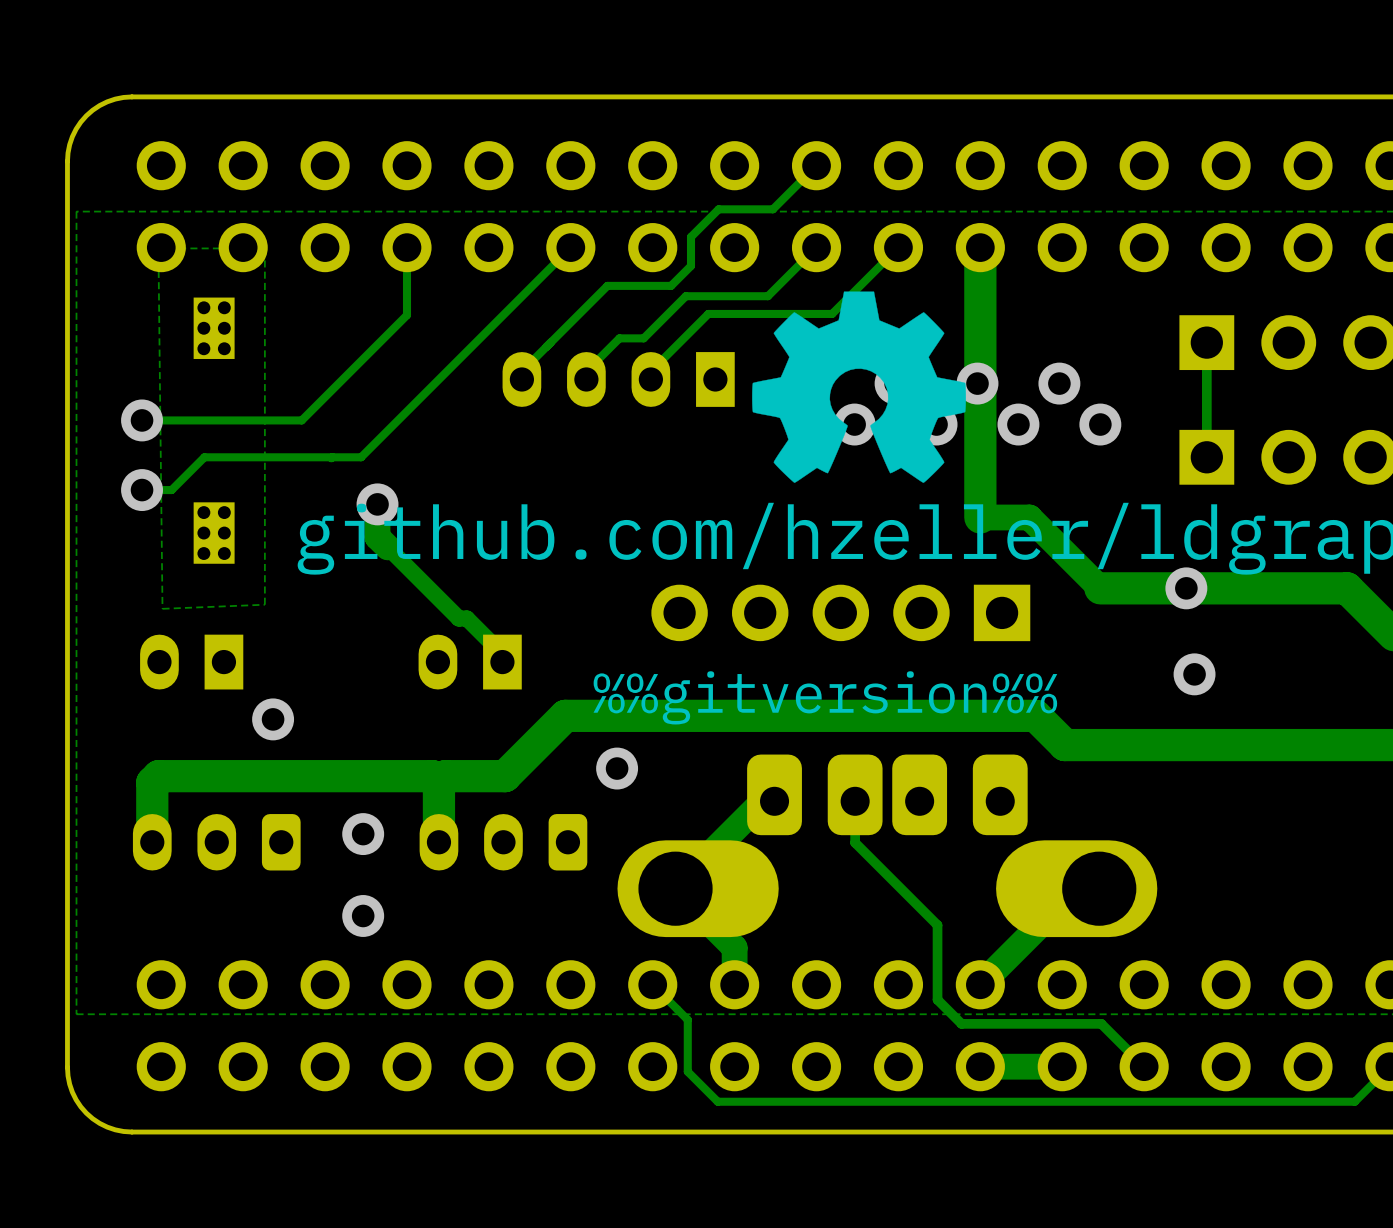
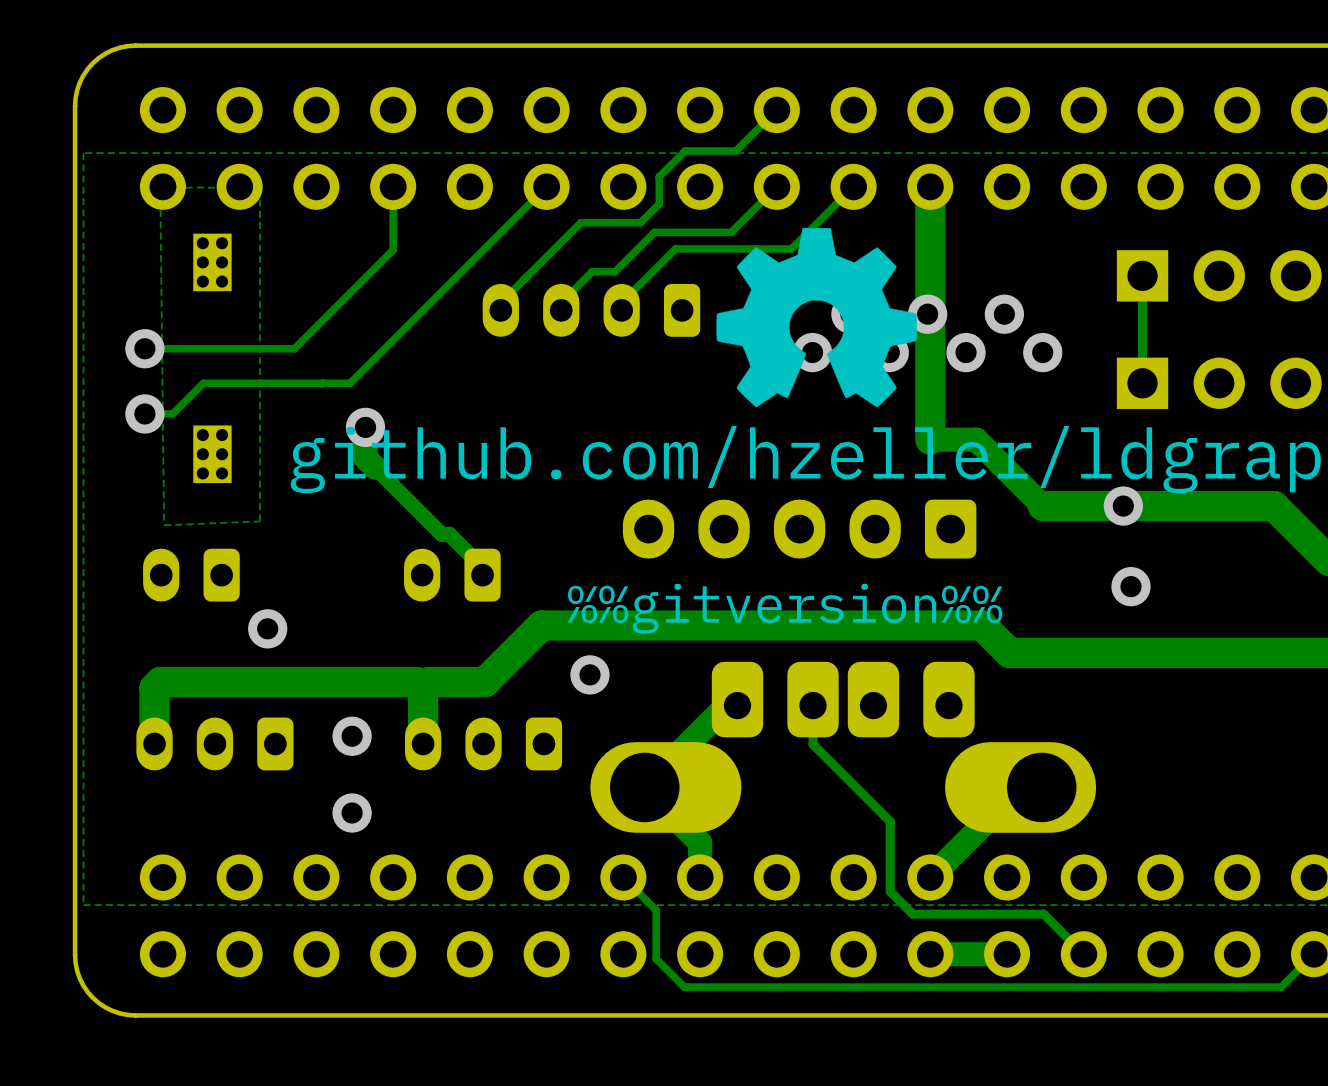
part footprint: [502, 352, 735, 407] -> [482, 283, 701, 337]
part footprint: [651, 584, 1031, 642] -> [622, 499, 977, 559]
part footprint: [140, 634, 244, 690] -> [143, 548, 240, 602]
part footprint: [418, 634, 522, 690] -> [404, 548, 501, 602]

